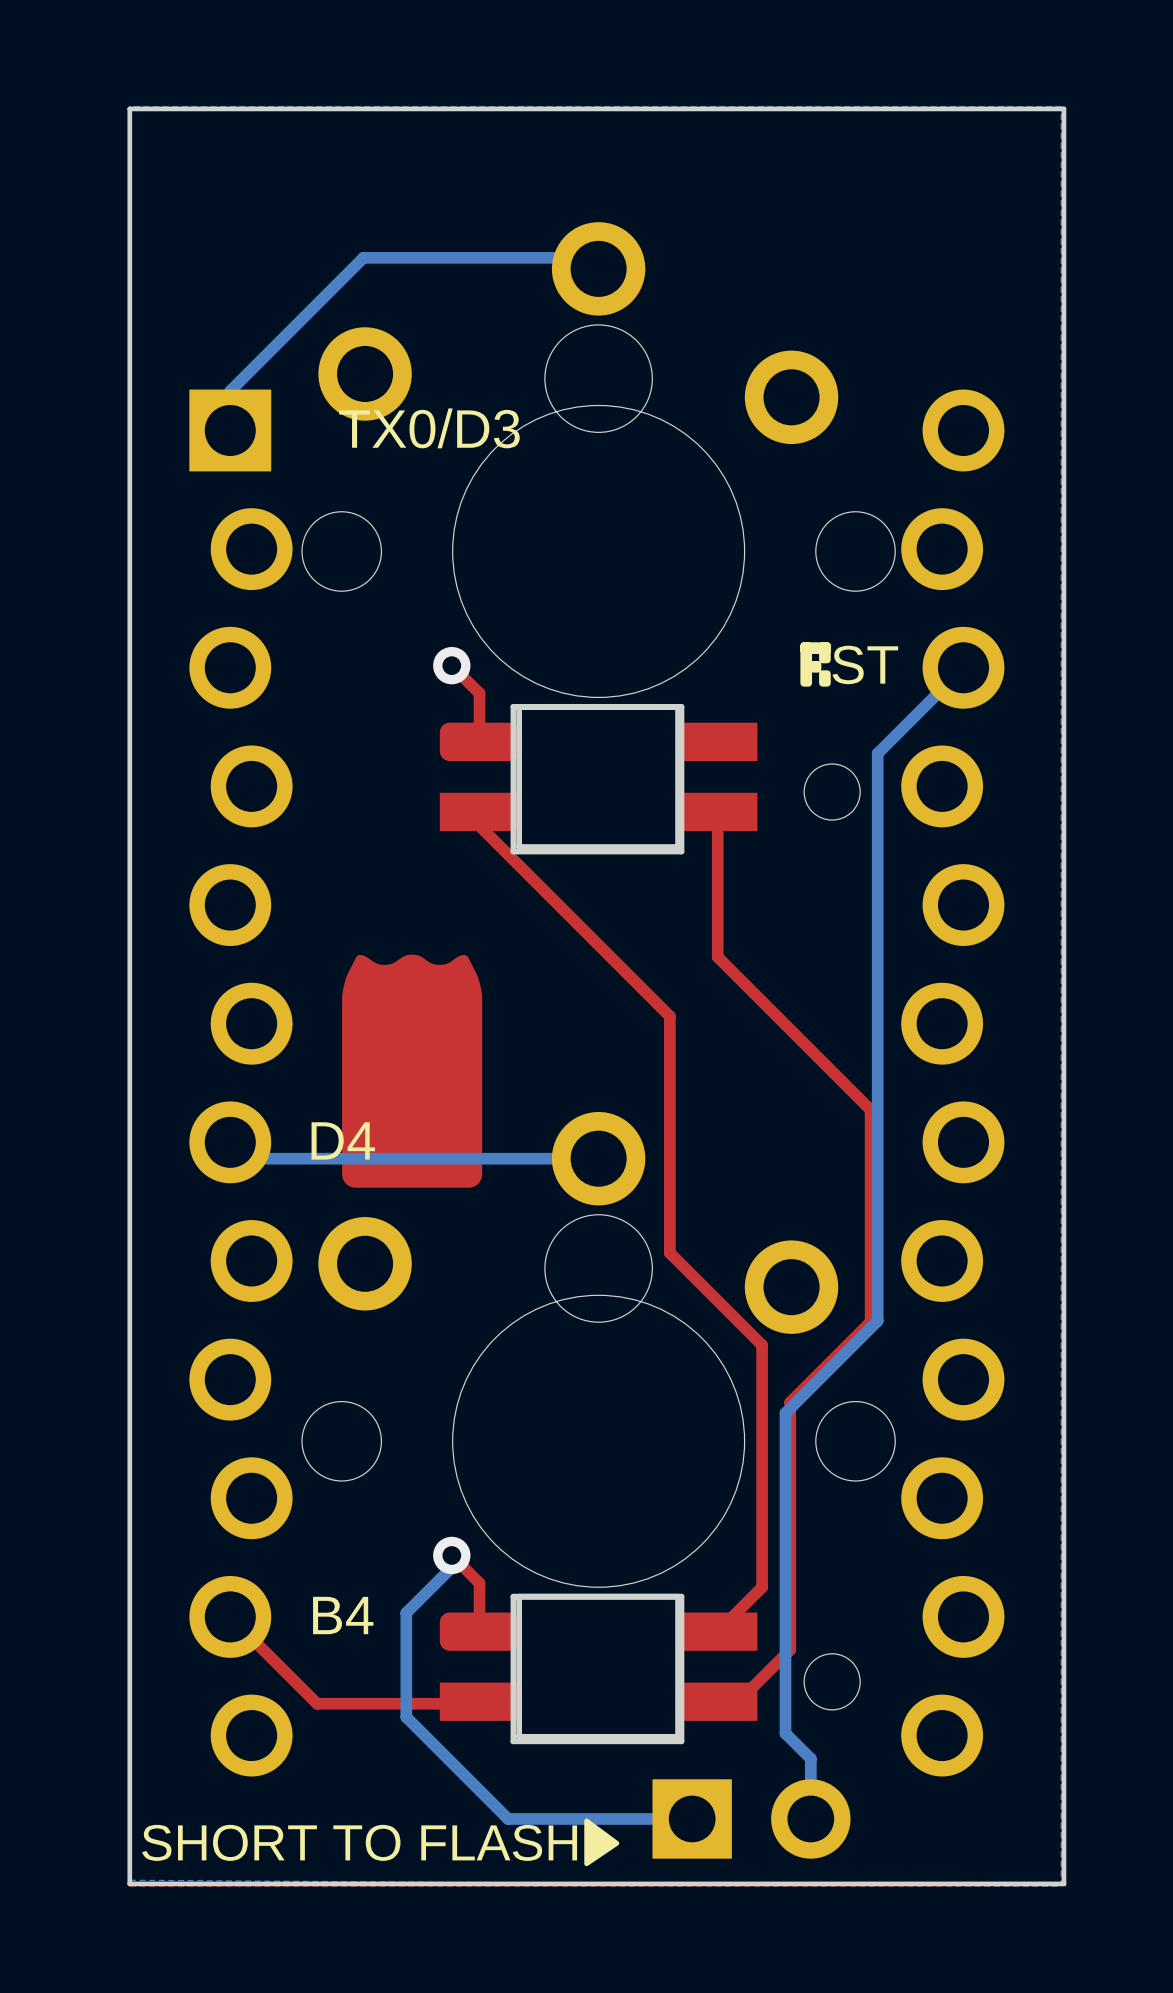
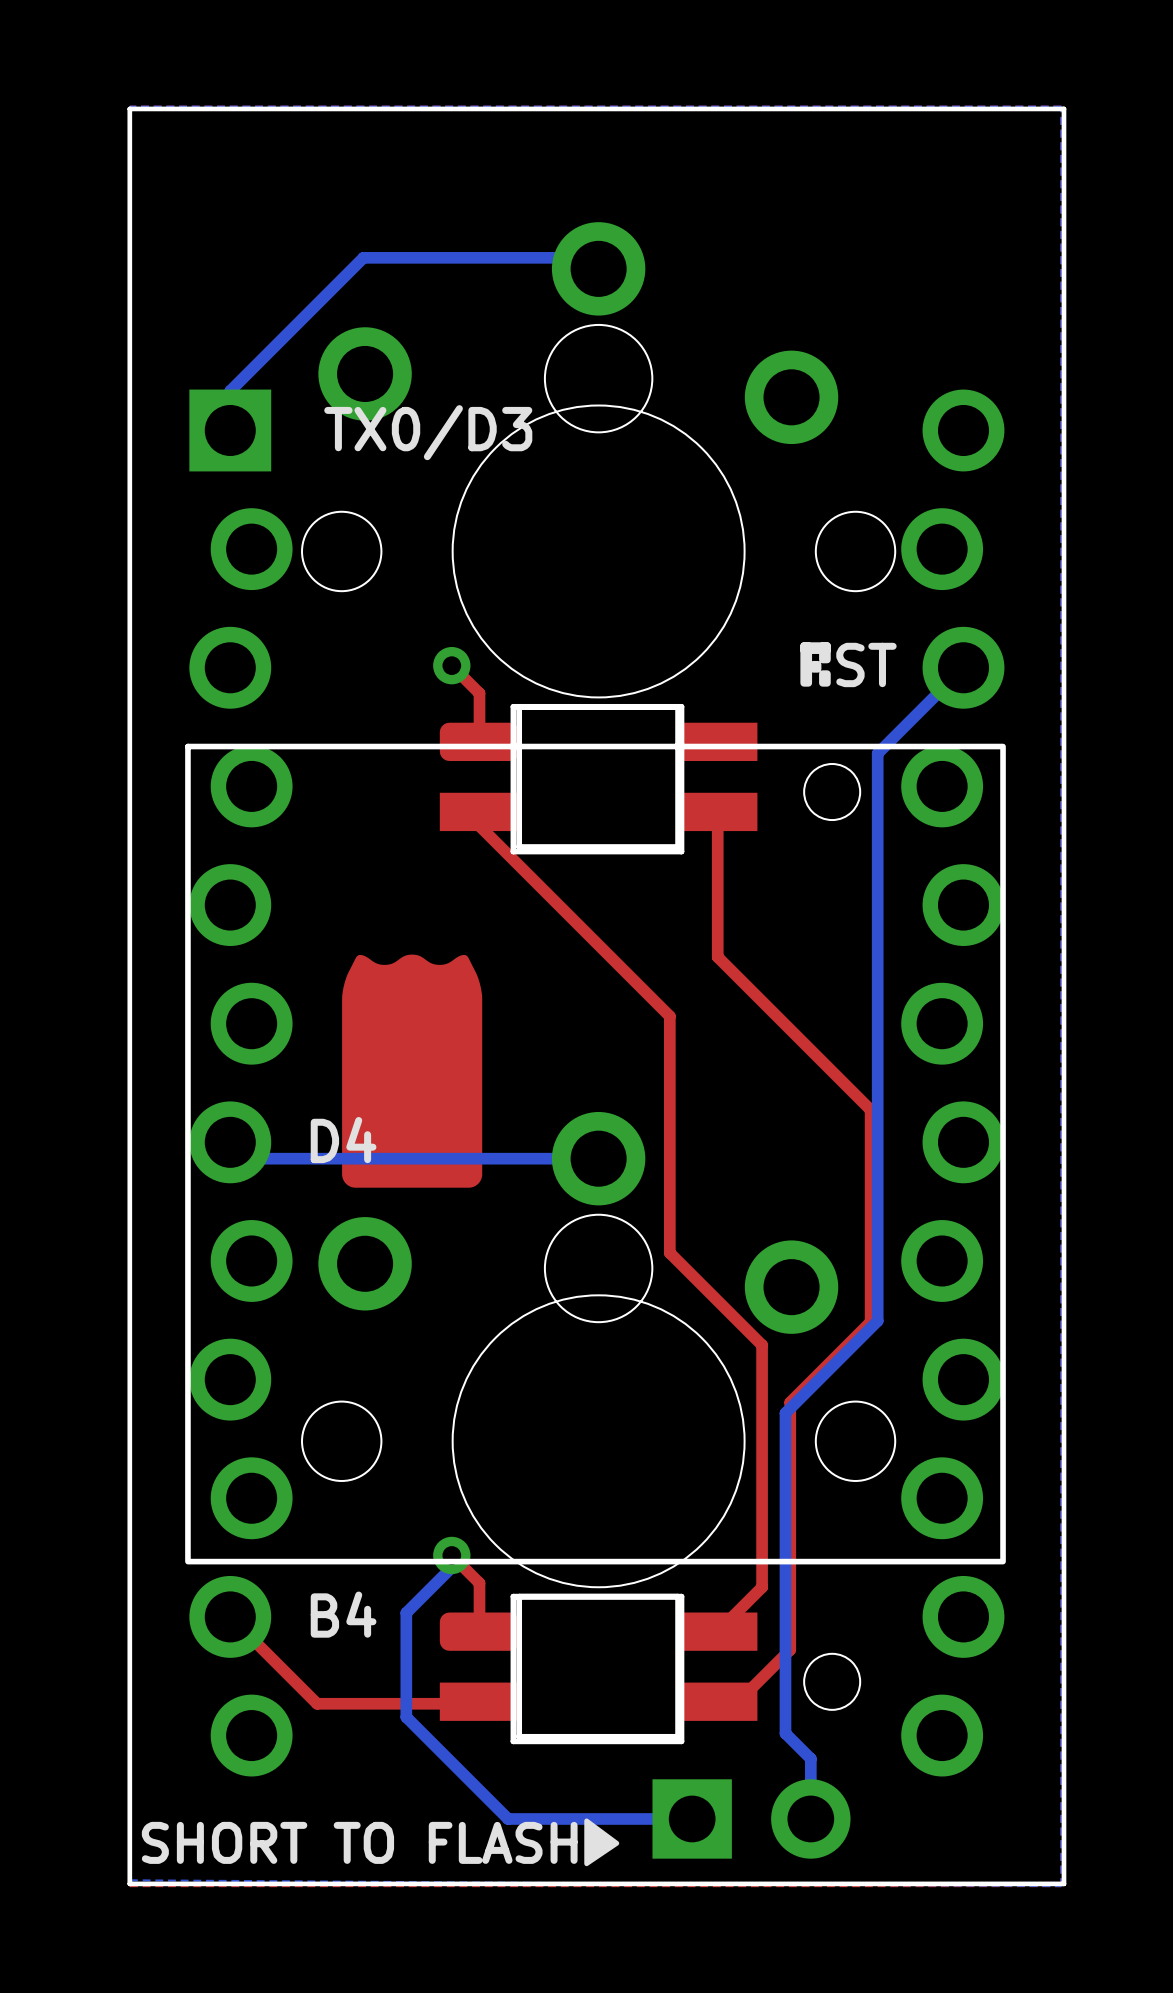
drawing: none -> [185, 743, 1006, 1565]

